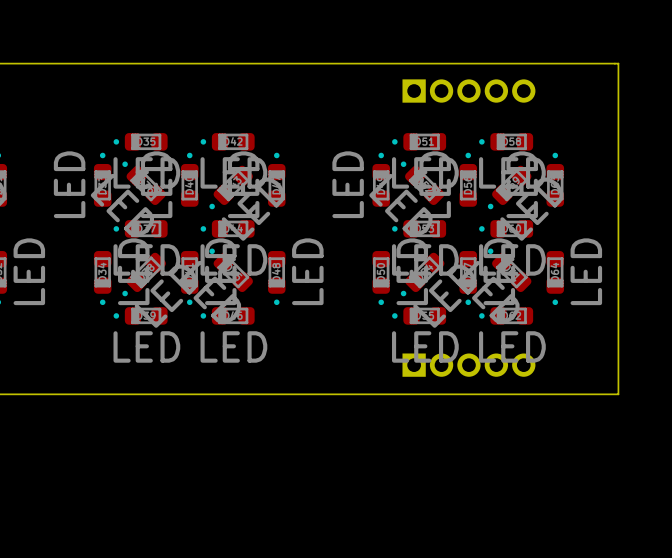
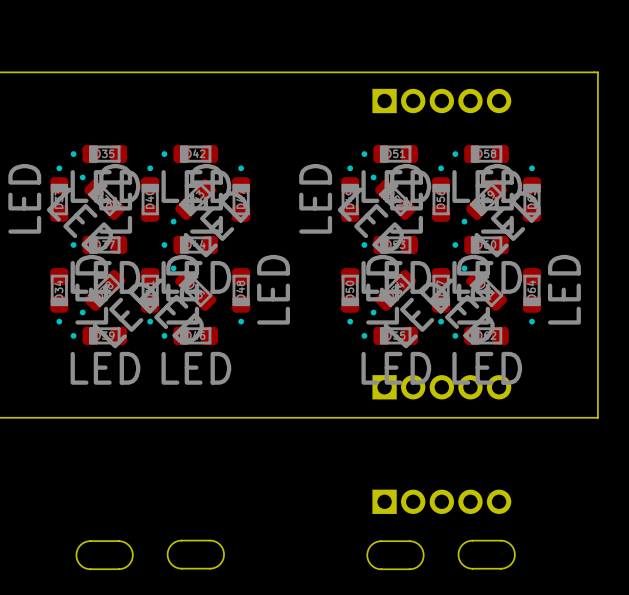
part: none -> (441, 501)
board edge: none -> (181, 540) (217, 542) (223, 550) (222, 561) (211, 568) (181, 568) (174, 566) (168, 559) (168, 550) (173, 543) (181, 540)
board edge: none -> (472, 540) (507, 542) (514, 551) (513, 561) (502, 568) (472, 568) (465, 566) (459, 560) (458, 551) (463, 543) (472, 540)
board edge: none -> (90, 541) (118, 541) (125, 543) (132, 551) (130, 562) (120, 569) (90, 569) (83, 567) (77, 560) (76, 551) (81, 544) (90, 541)
board edge: none -> (381, 541) (409, 541) (416, 543) (423, 551) (421, 562) (411, 569) (381, 569) (374, 567) (368, 560) (367, 551) (372, 544) (381, 541)

